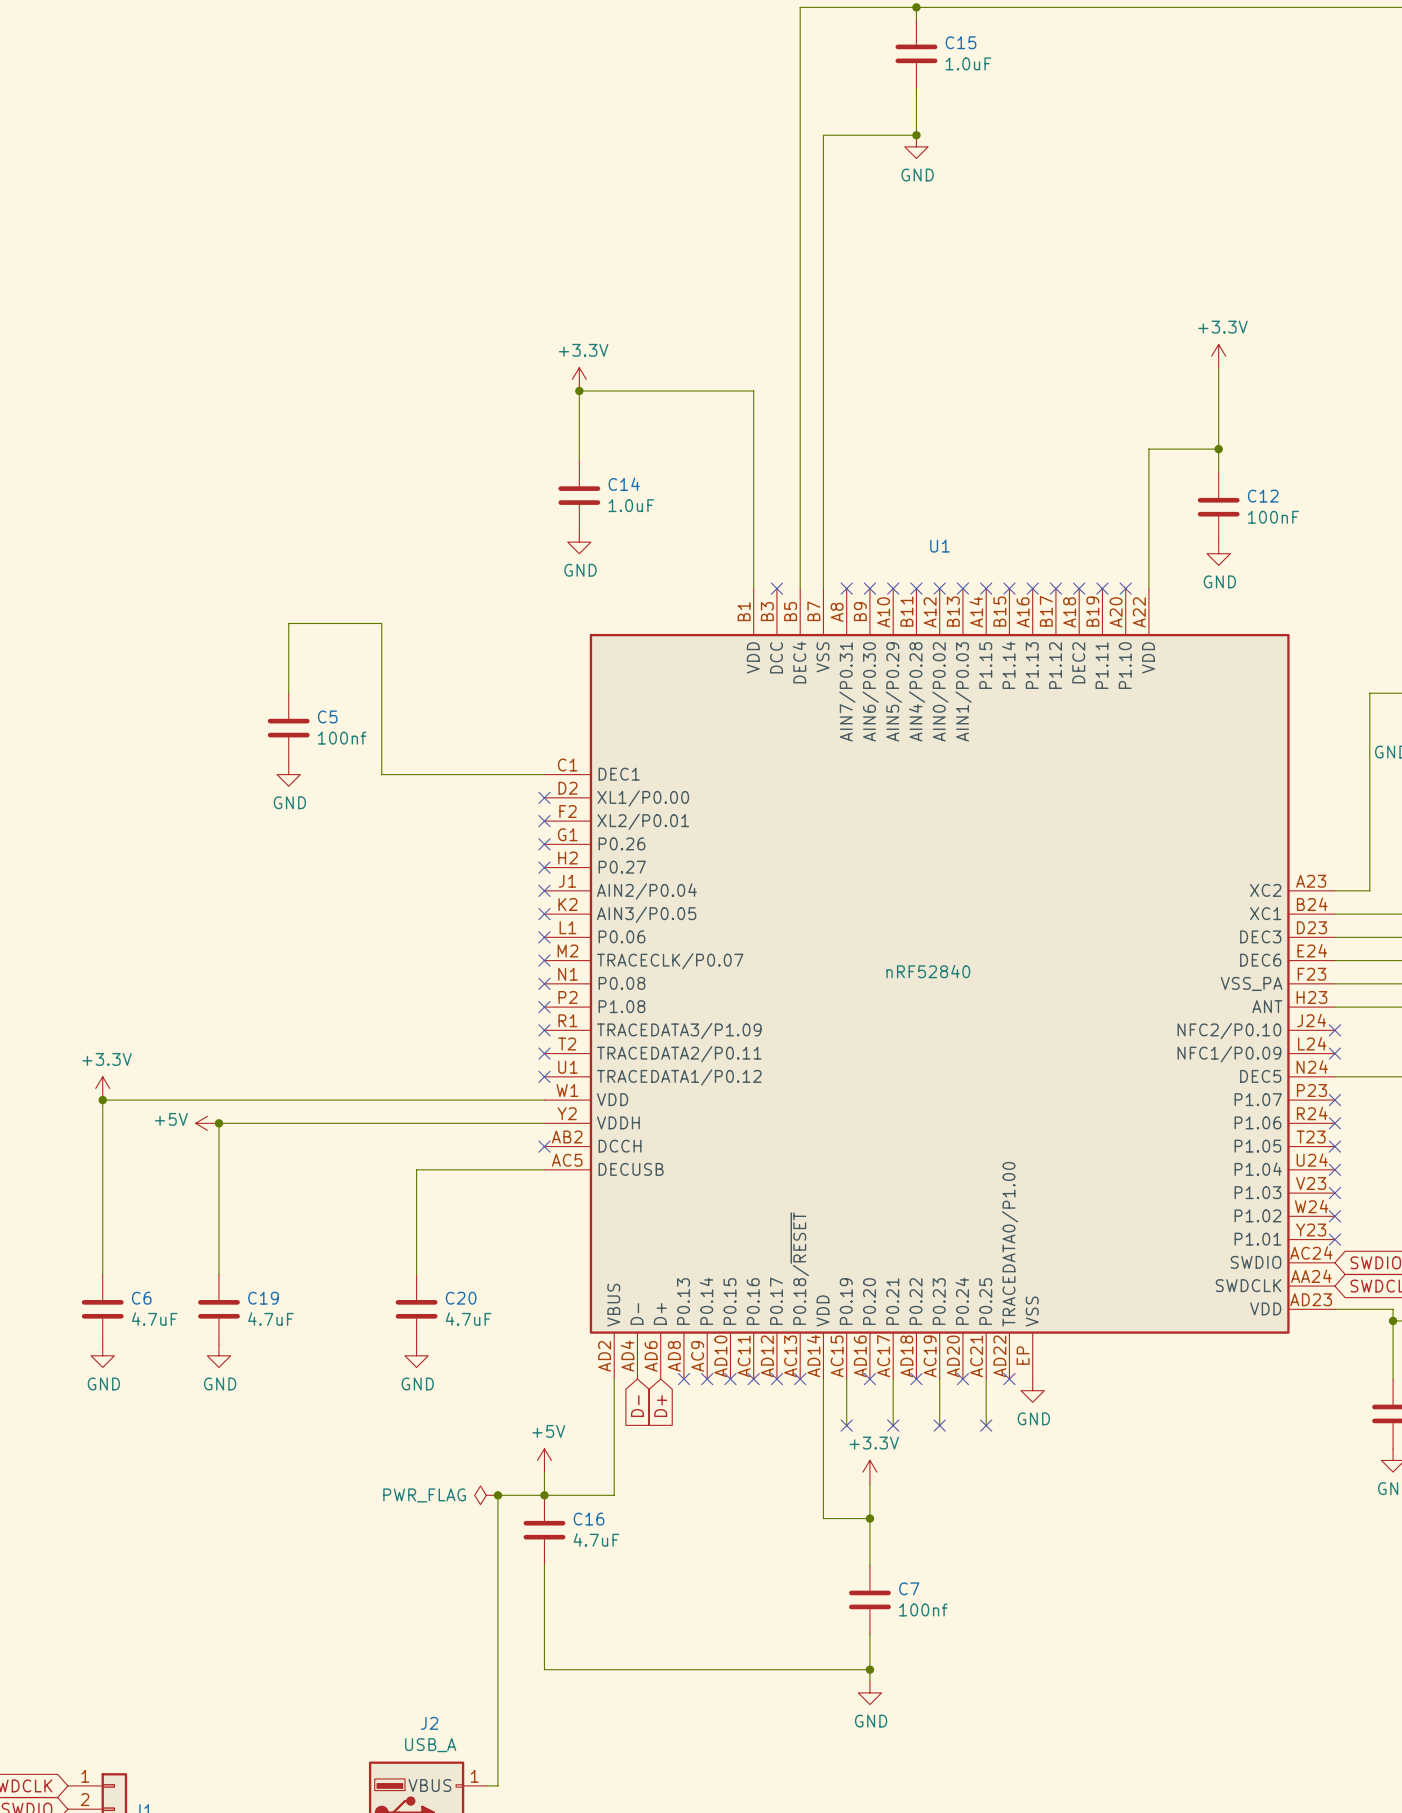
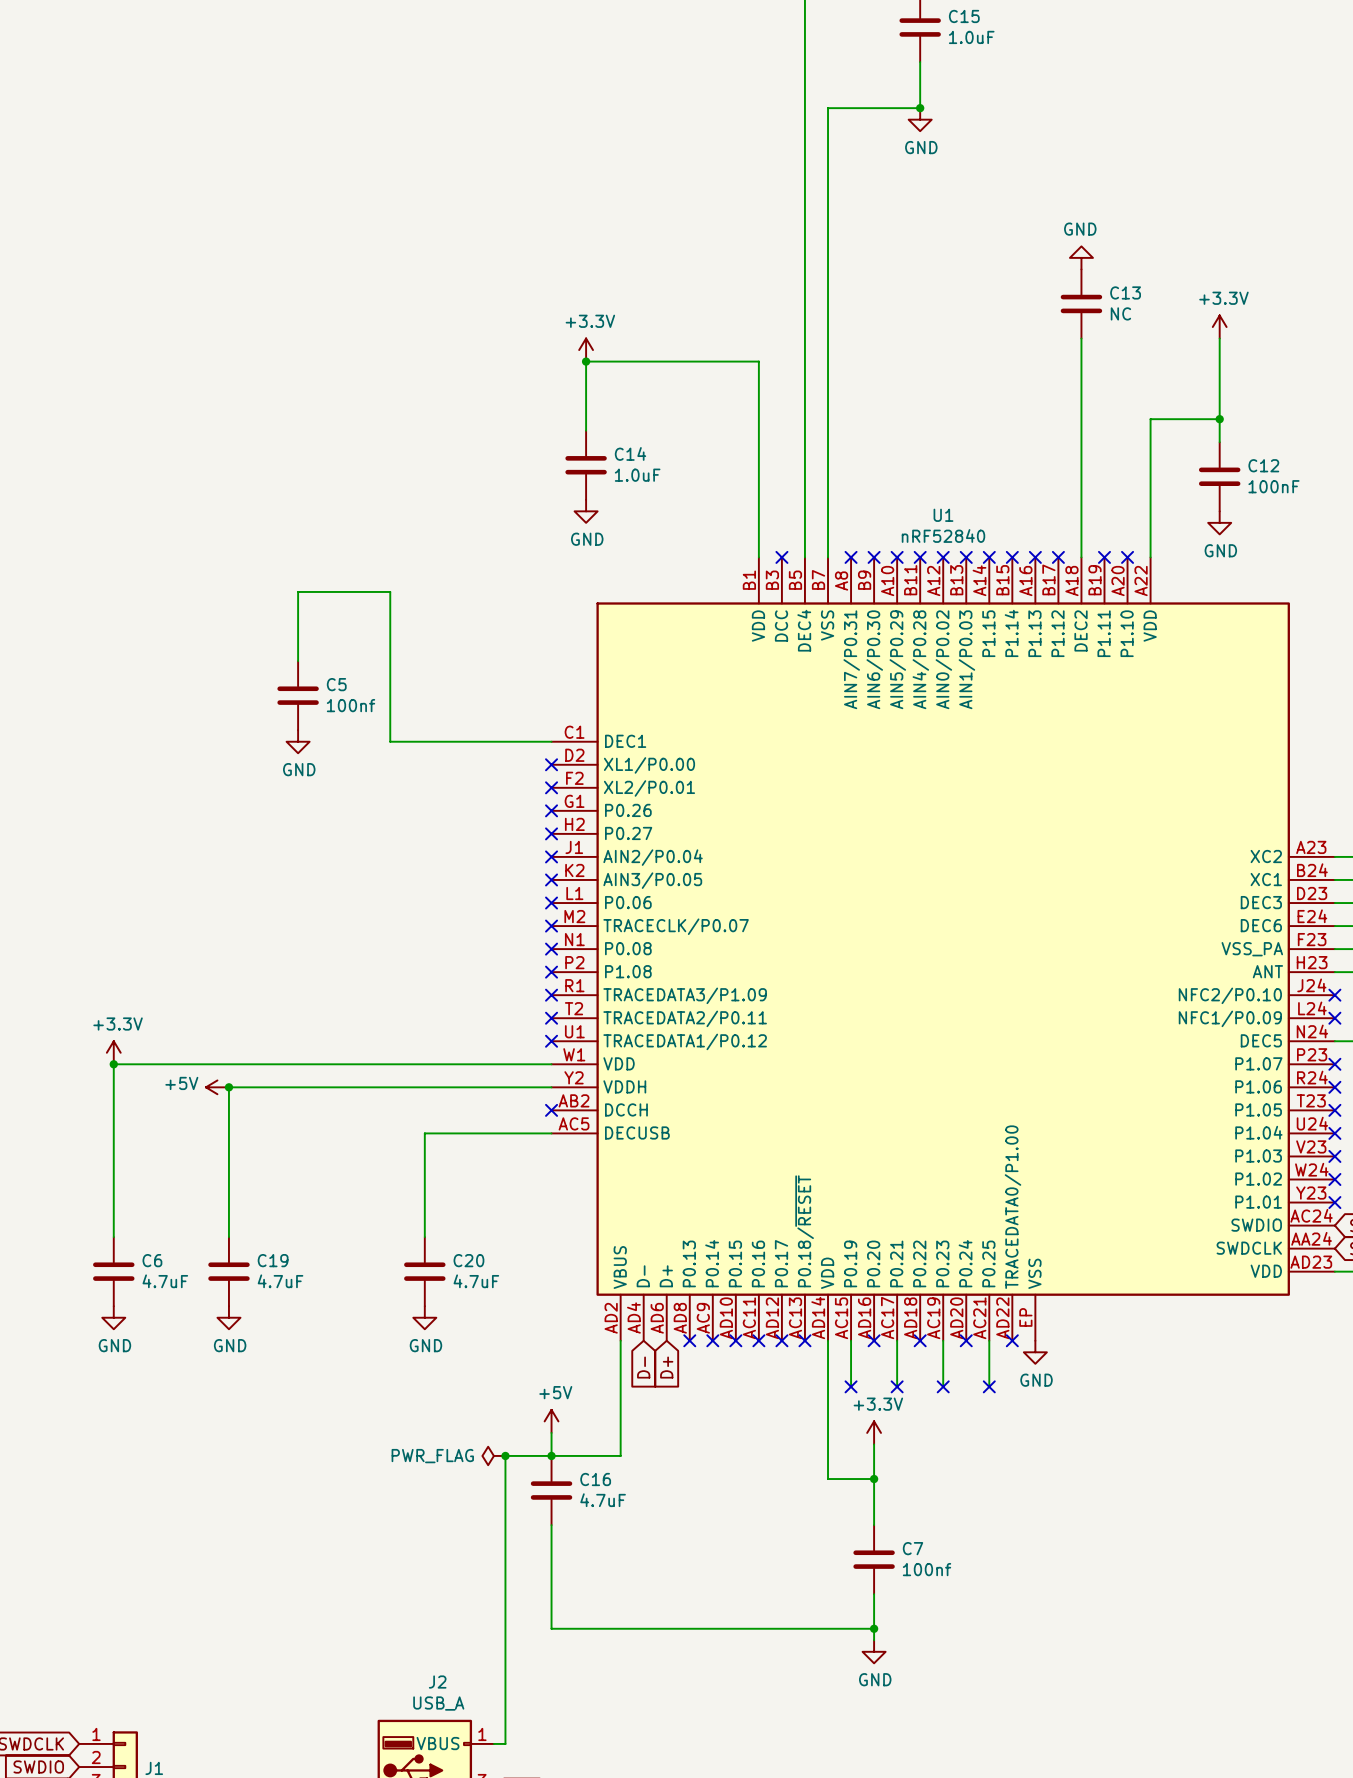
power symbol: none -> GND (1081, 257)
C13: none -> NC (1081, 303)
wire: none -> (1081, 338) (1081, 557)
no-connect mark: (1079, 588) -> none
U1 value position: nRF52840 (928, 971) -> nRF52840 (943, 535)

